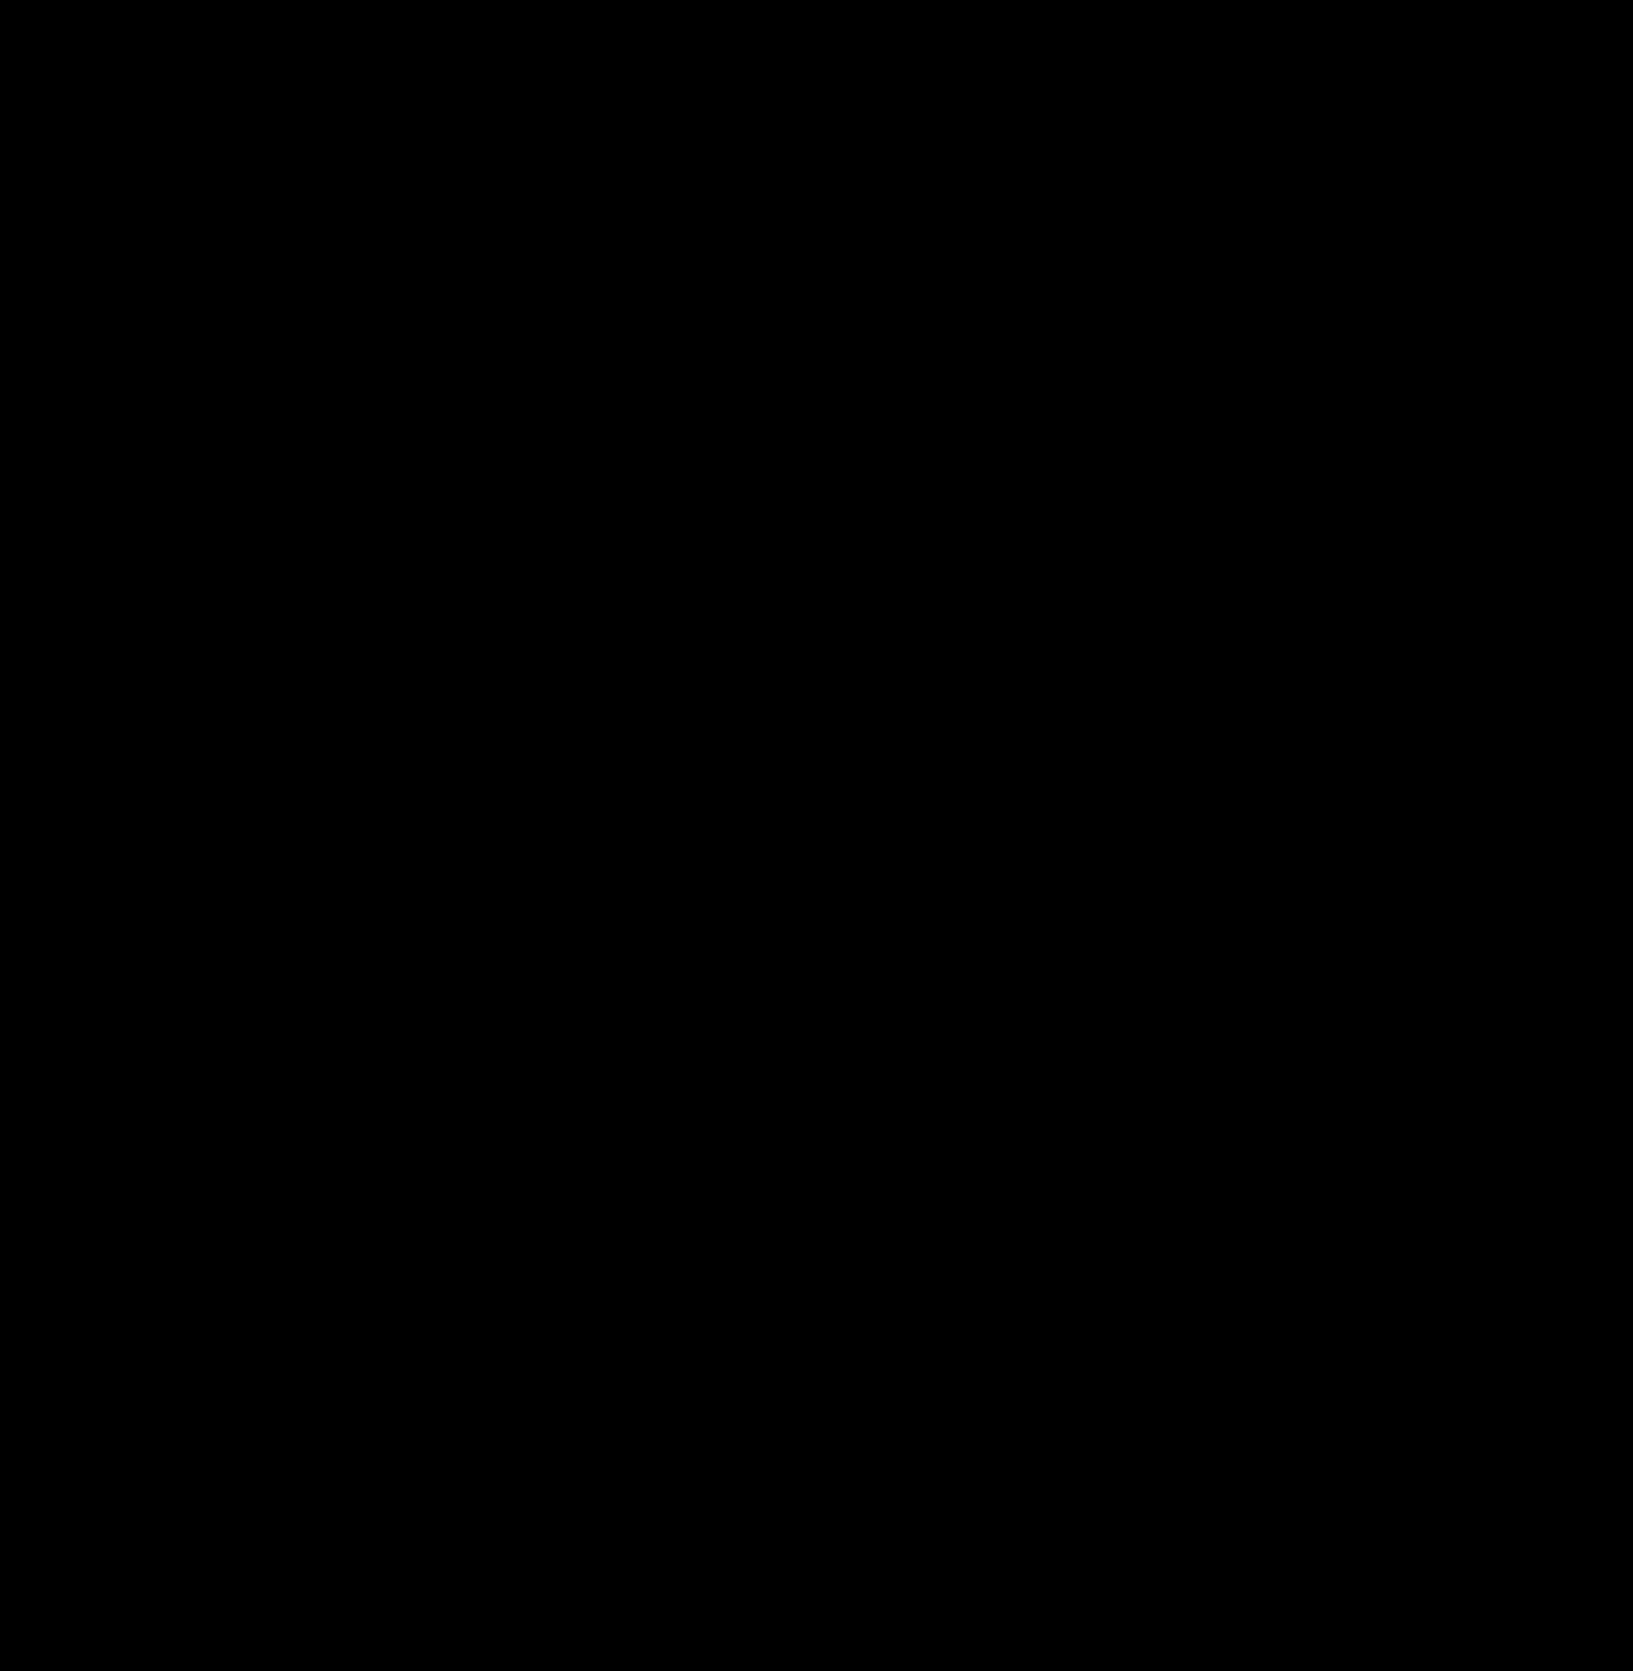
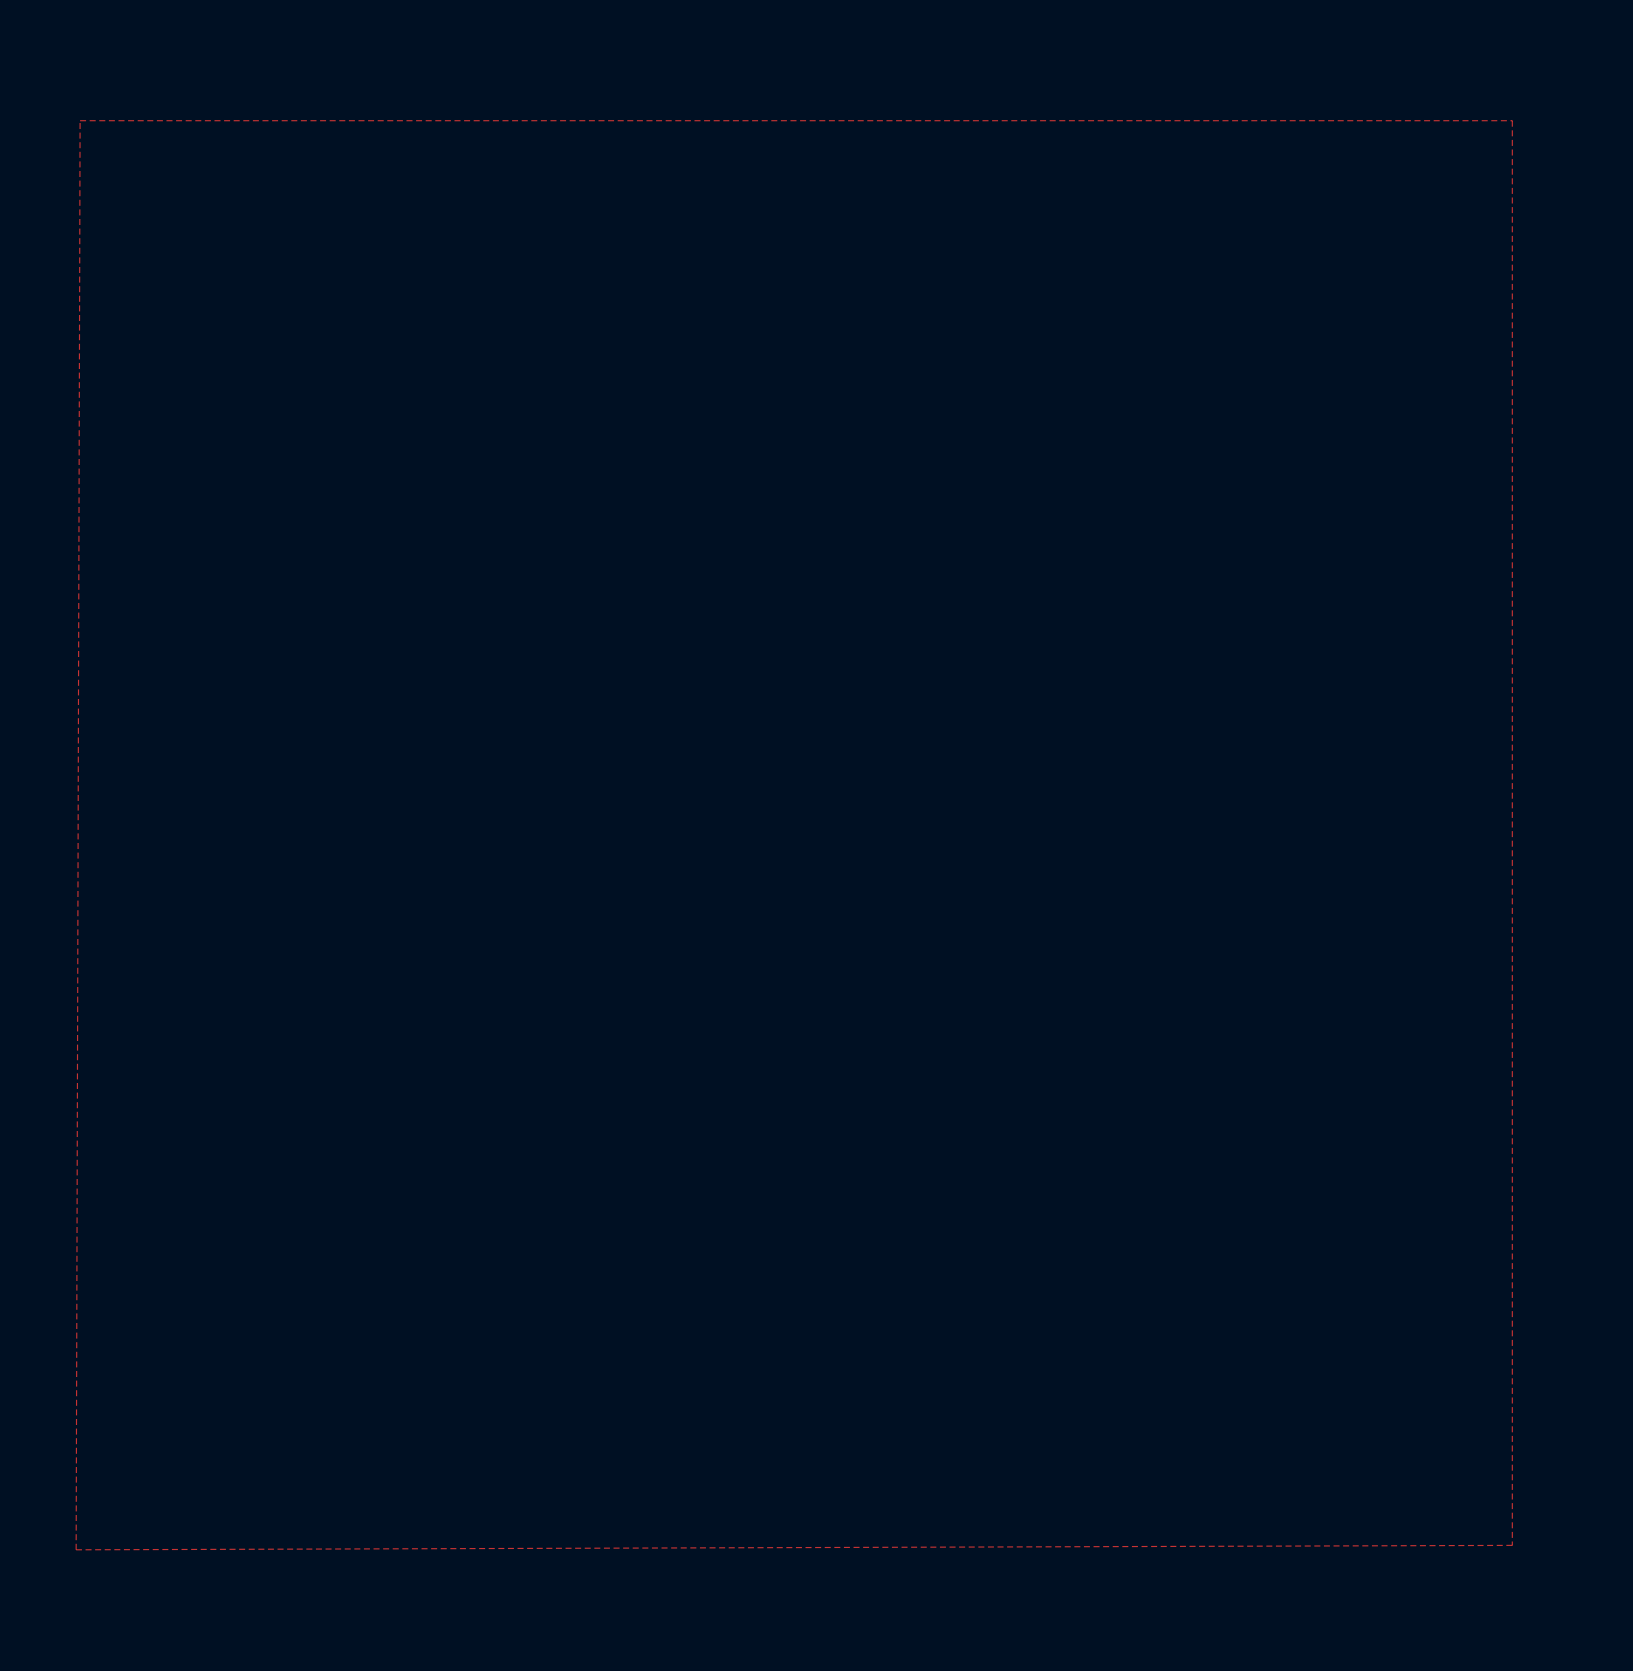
zone outline: none -> (80, 120) (76, 1549) (1512, 1545) (1512, 120) (80, 120)

